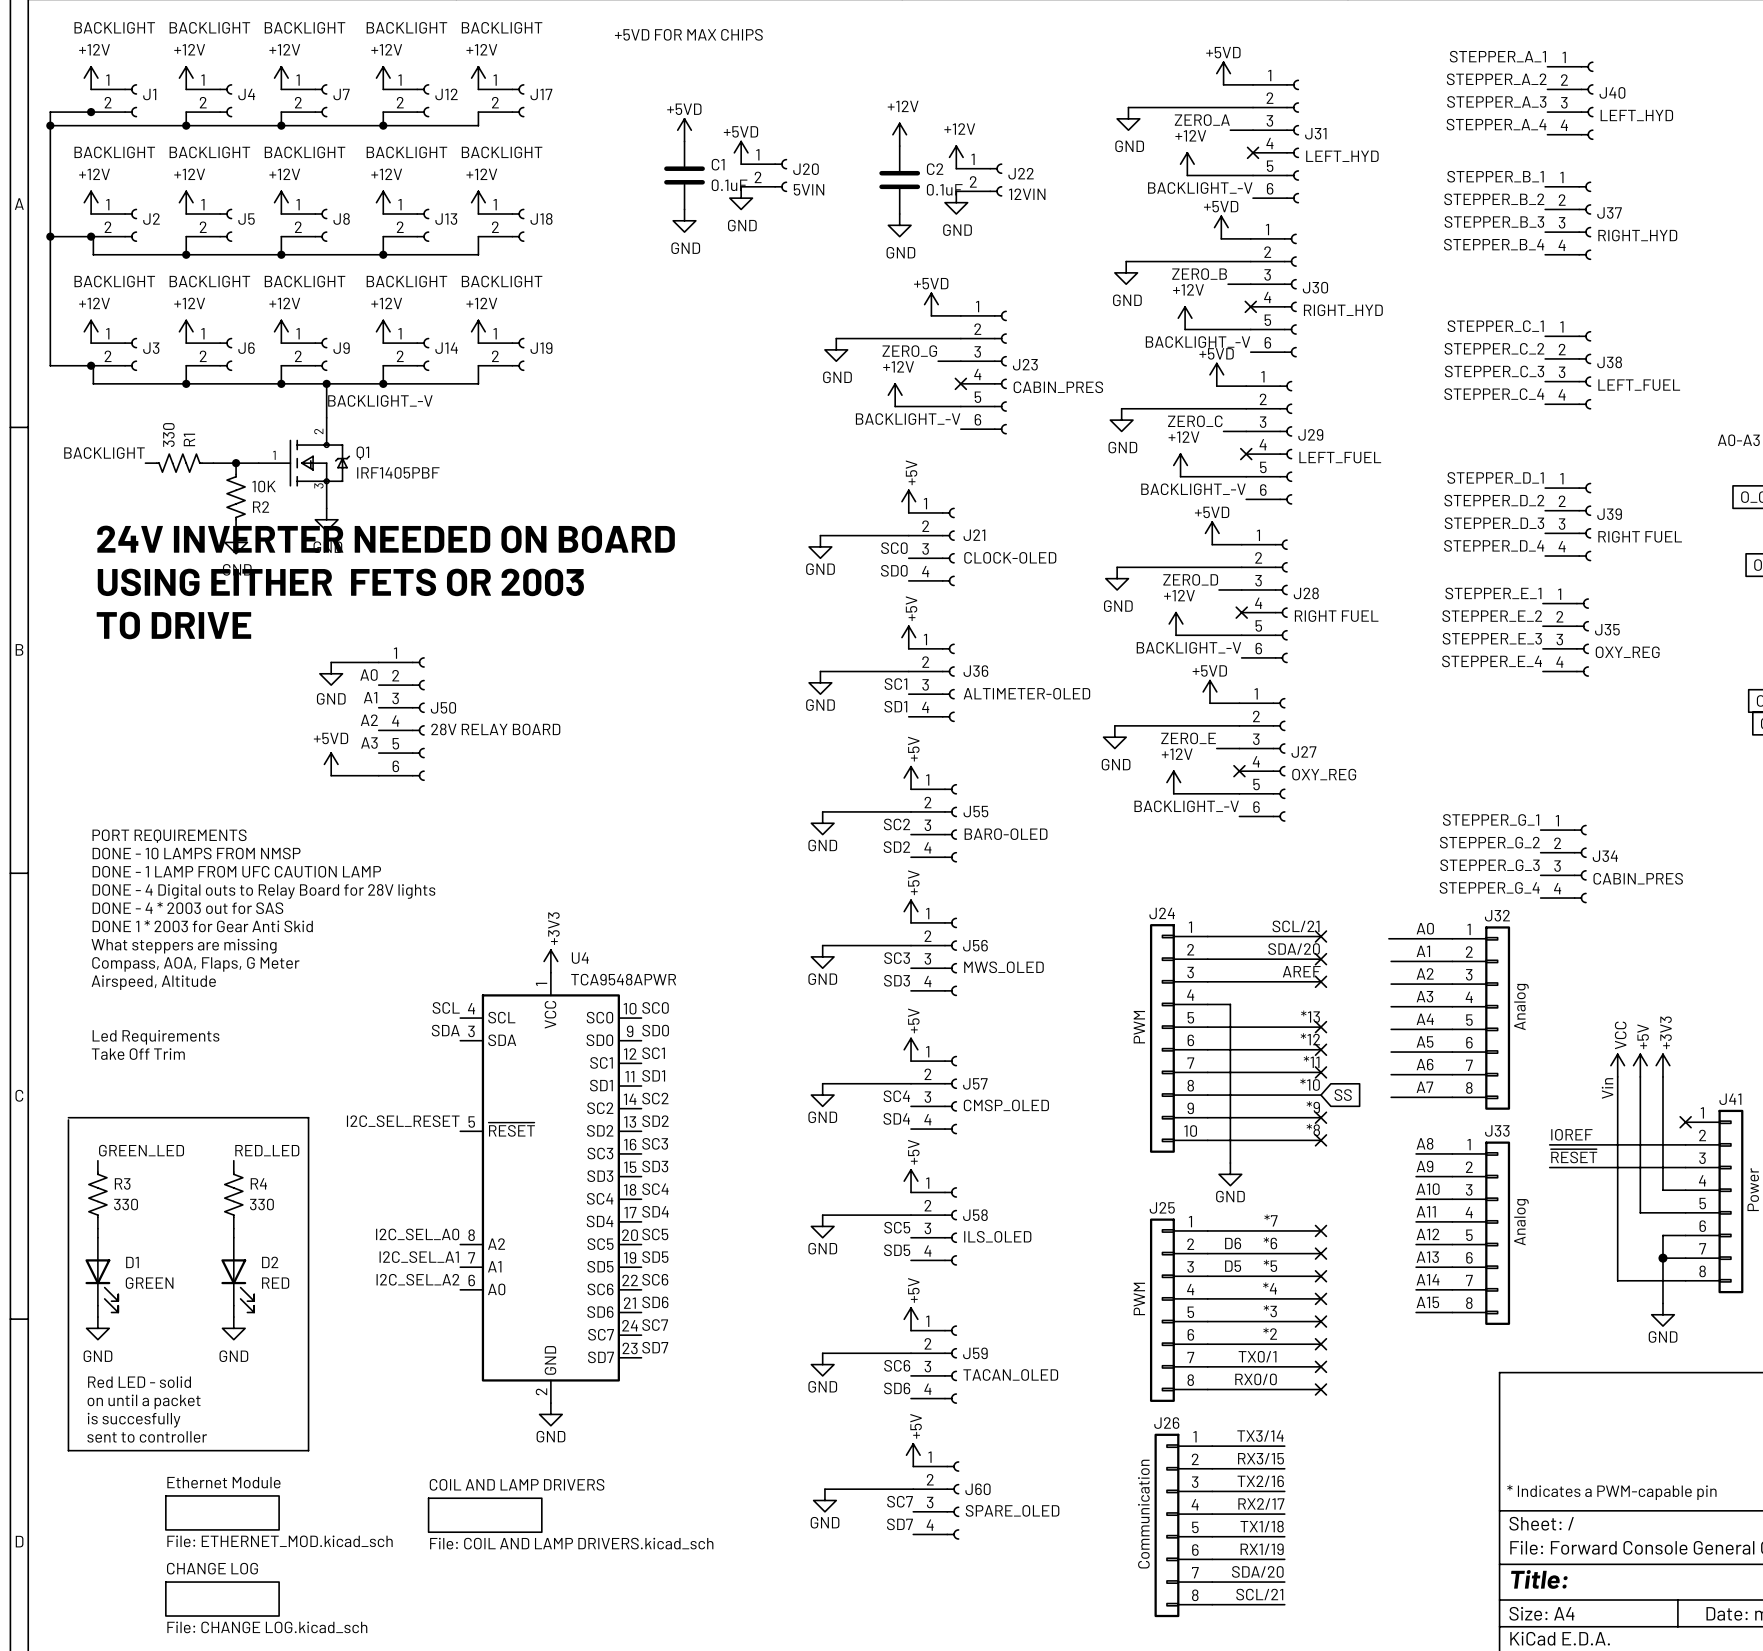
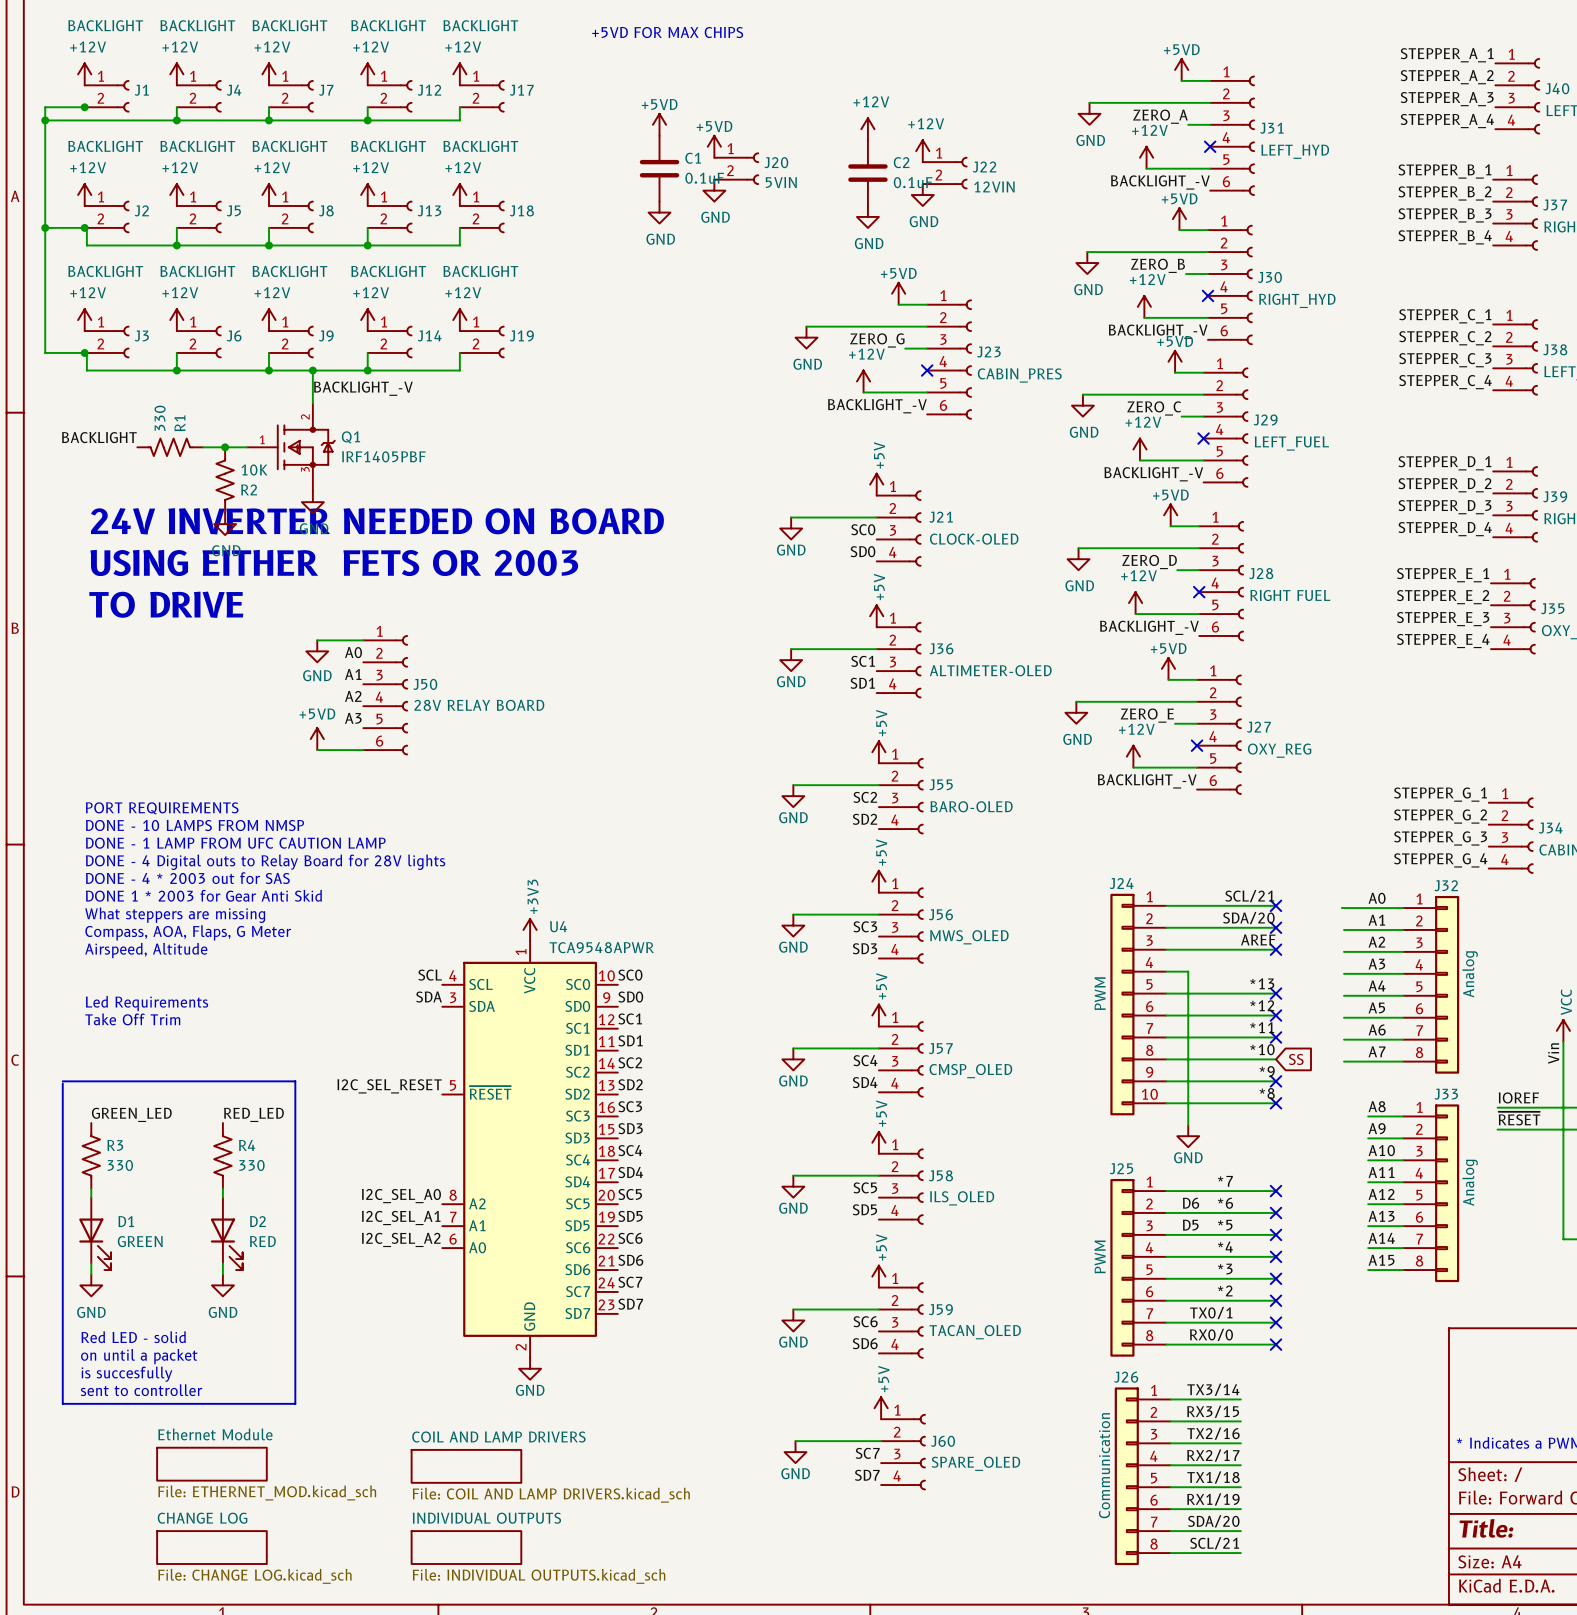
sheet INDIVIDUAL OUTPUTS: none -> File: INDIVIDUAL OUTPUTS.kicad_sch (466, 1547)

